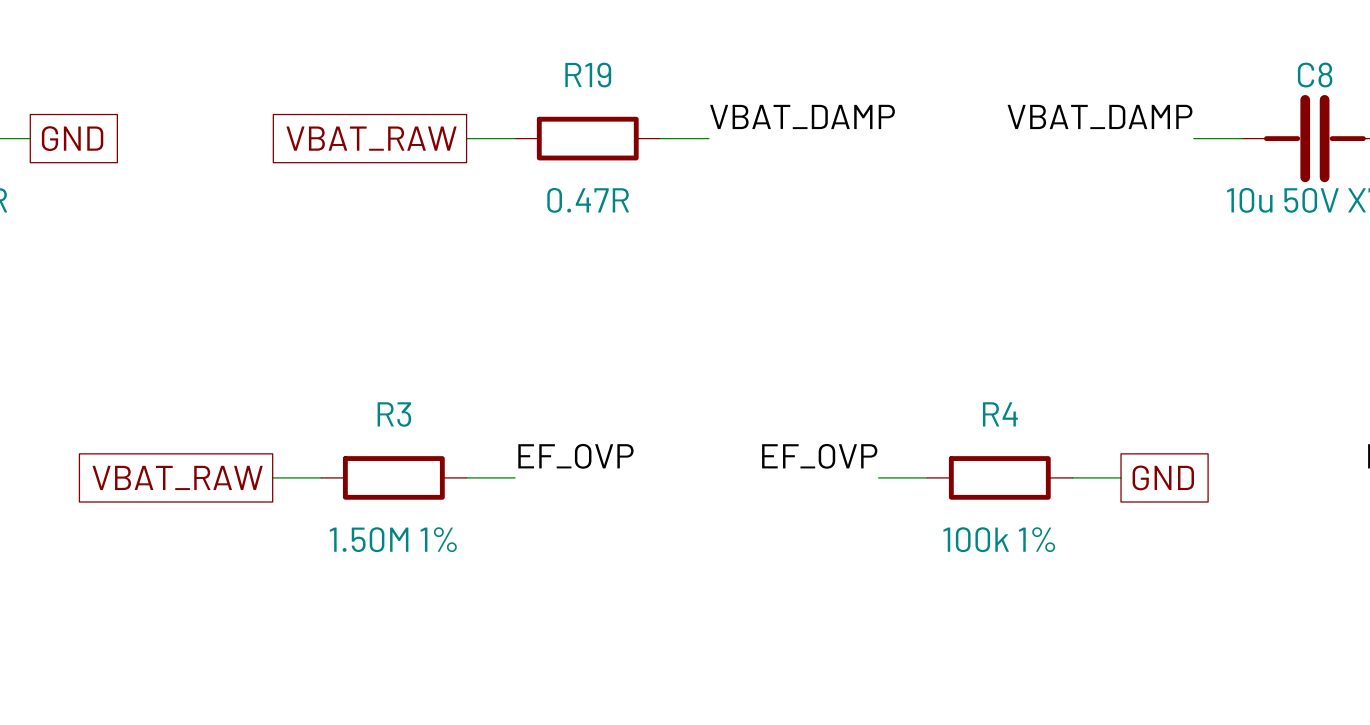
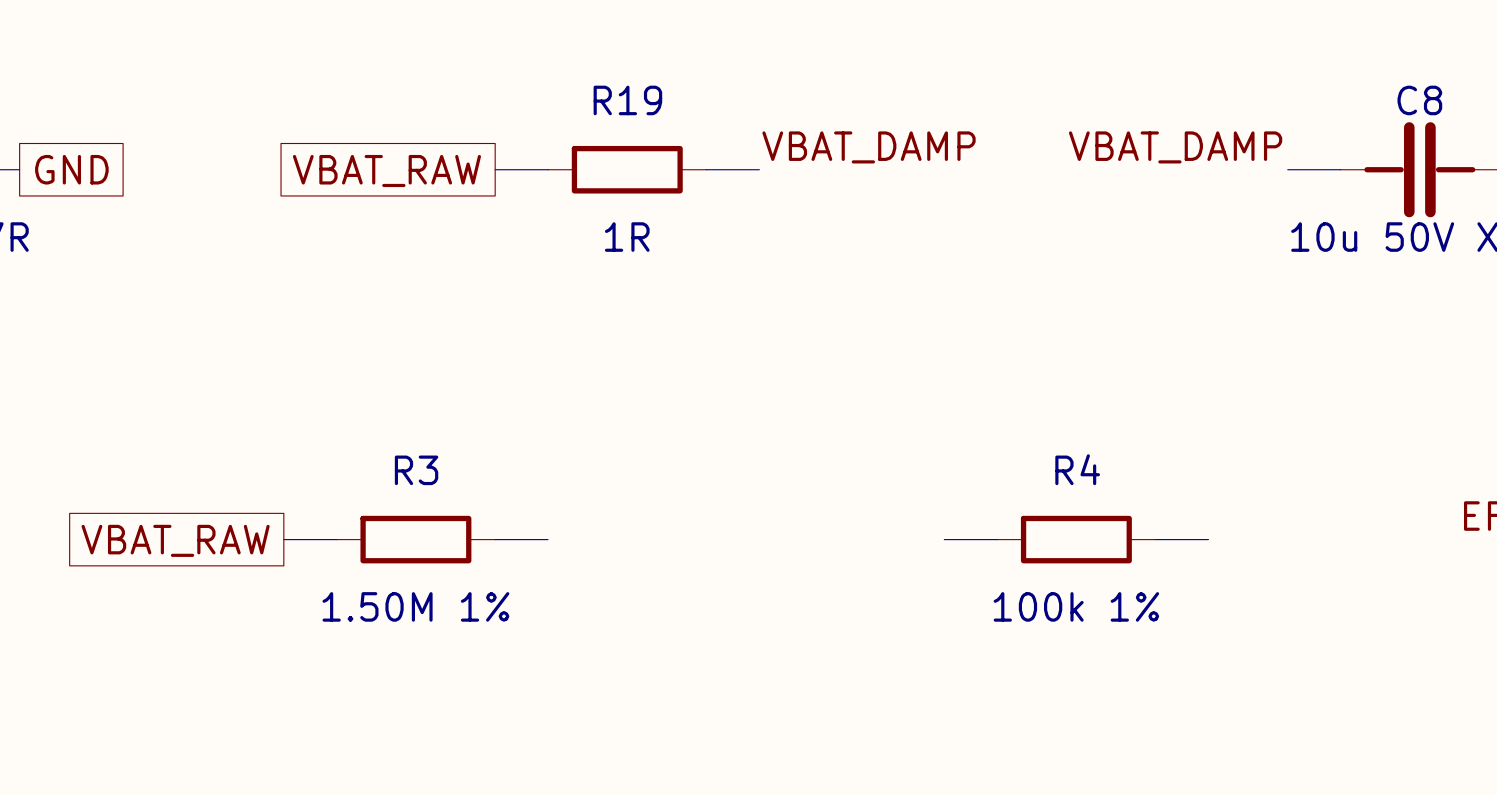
R19 value: 0.47R (588, 200) -> 1R (627, 237)
label: EF_OVP (575, 456) -> none
label: EF_OVP (819, 456) -> none
global label: GND (1163, 477) -> none

